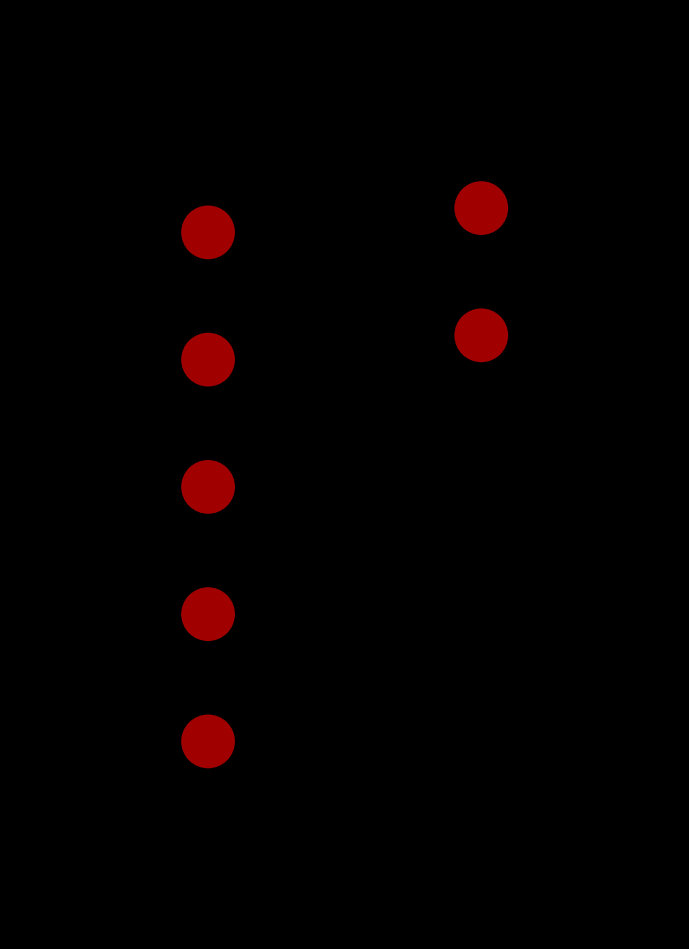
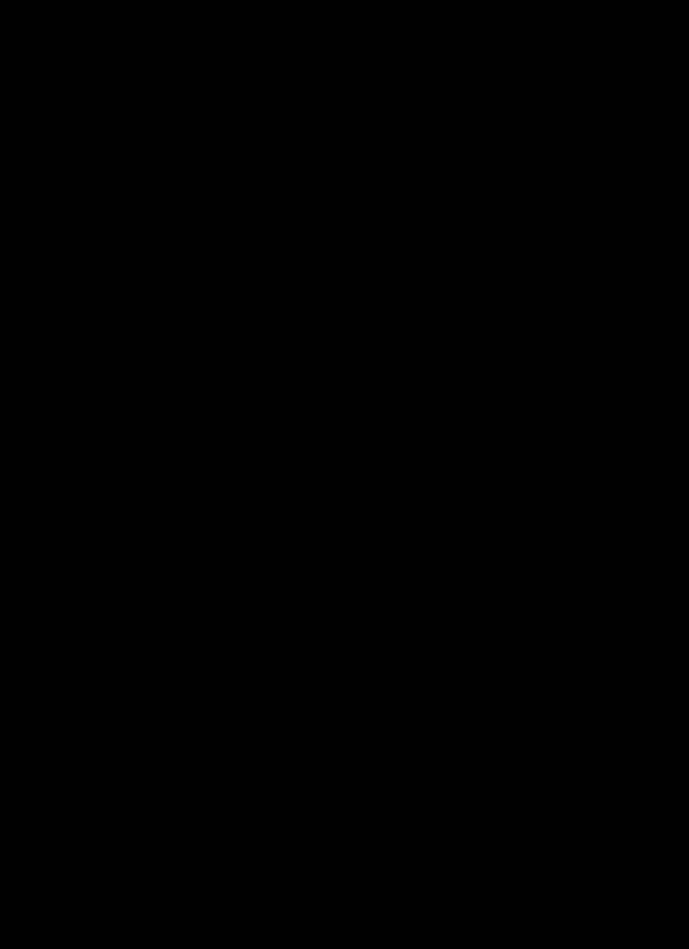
part: (481, 208) -> none
part: (208, 232) -> none
part: (481, 335) -> none
part: (208, 359) -> none
part: (208, 486) -> none
part: (208, 614) -> none
part: (208, 741) -> none

